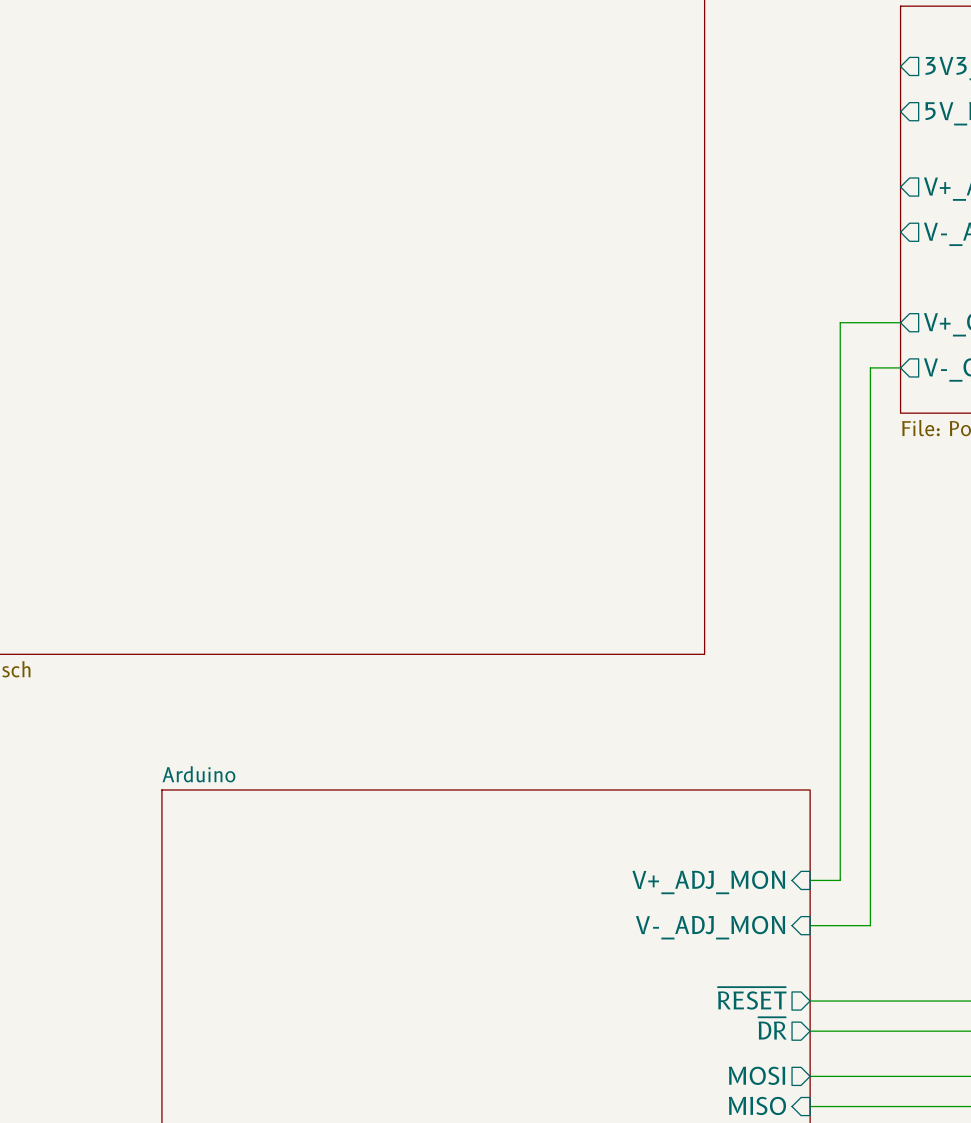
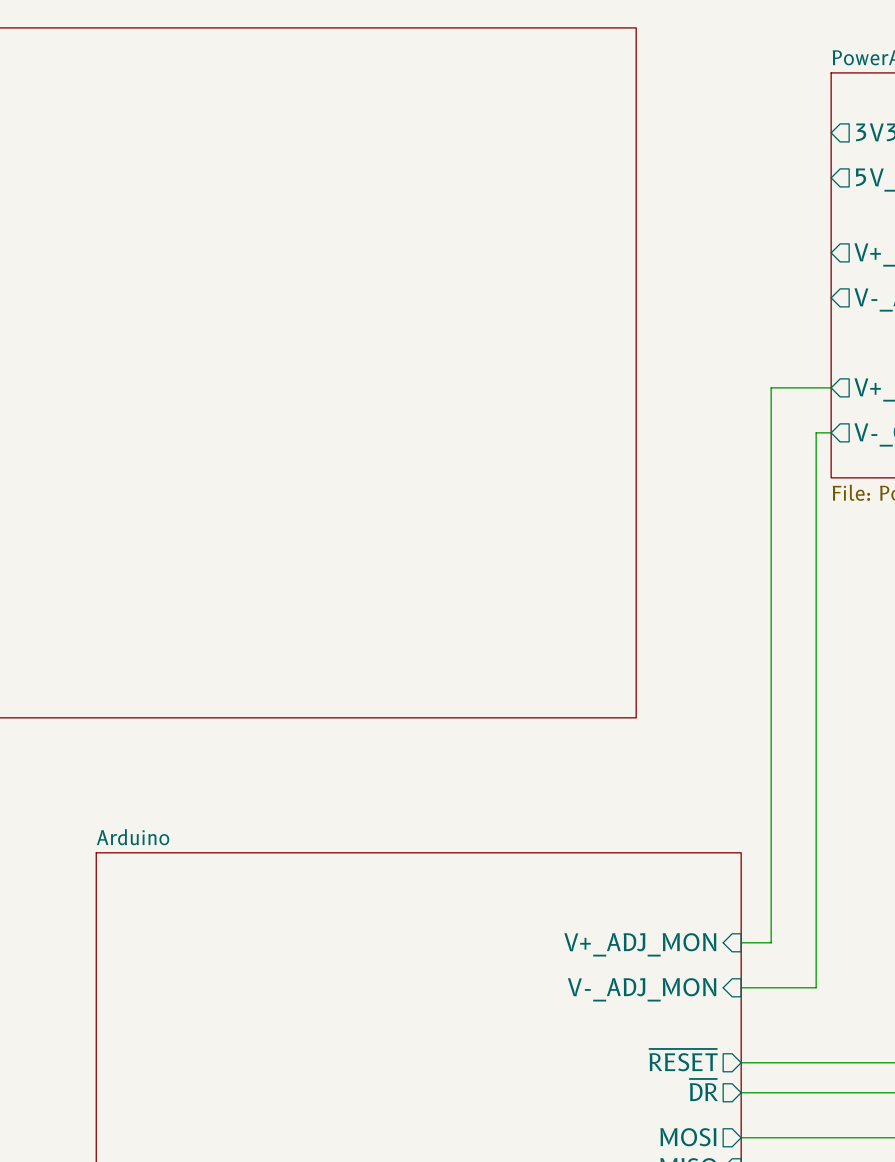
wire: (885, 367) (870, 367) (870, 925) -> (816, 432) (816, 987) (801, 987)

